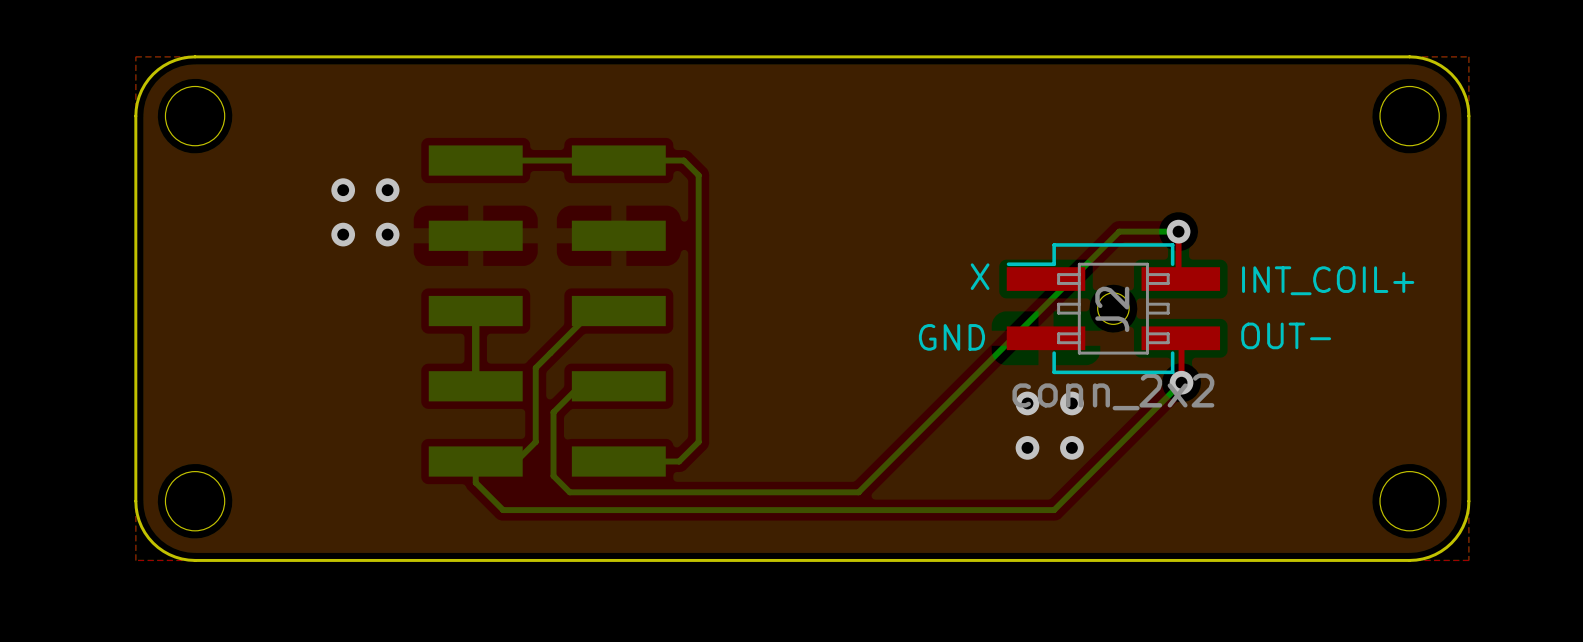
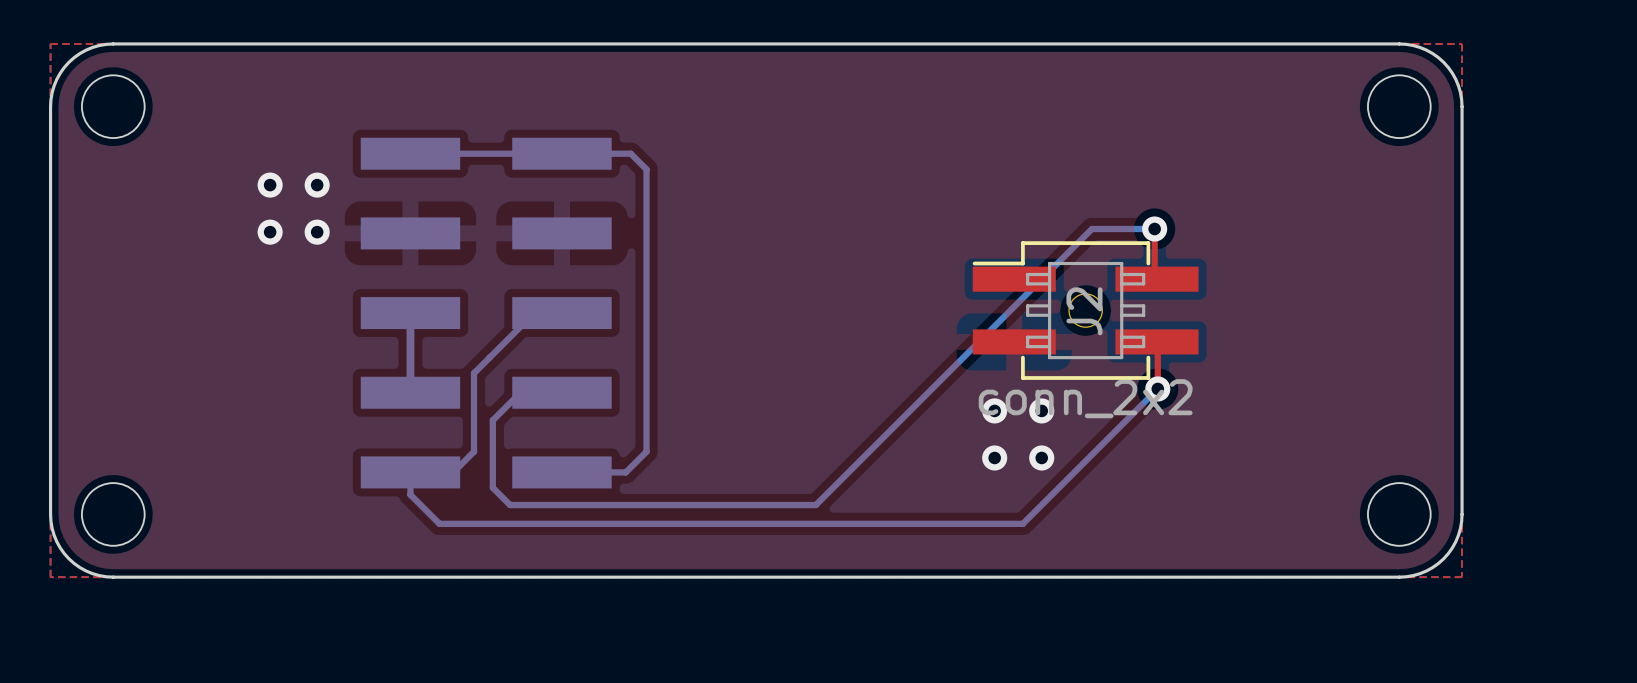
text: X (980, 276) -> none
text: INT_COIL+ (1328, 280) -> none
text: OUT- (1286, 335) -> none
text: GND (951, 337) -> none

